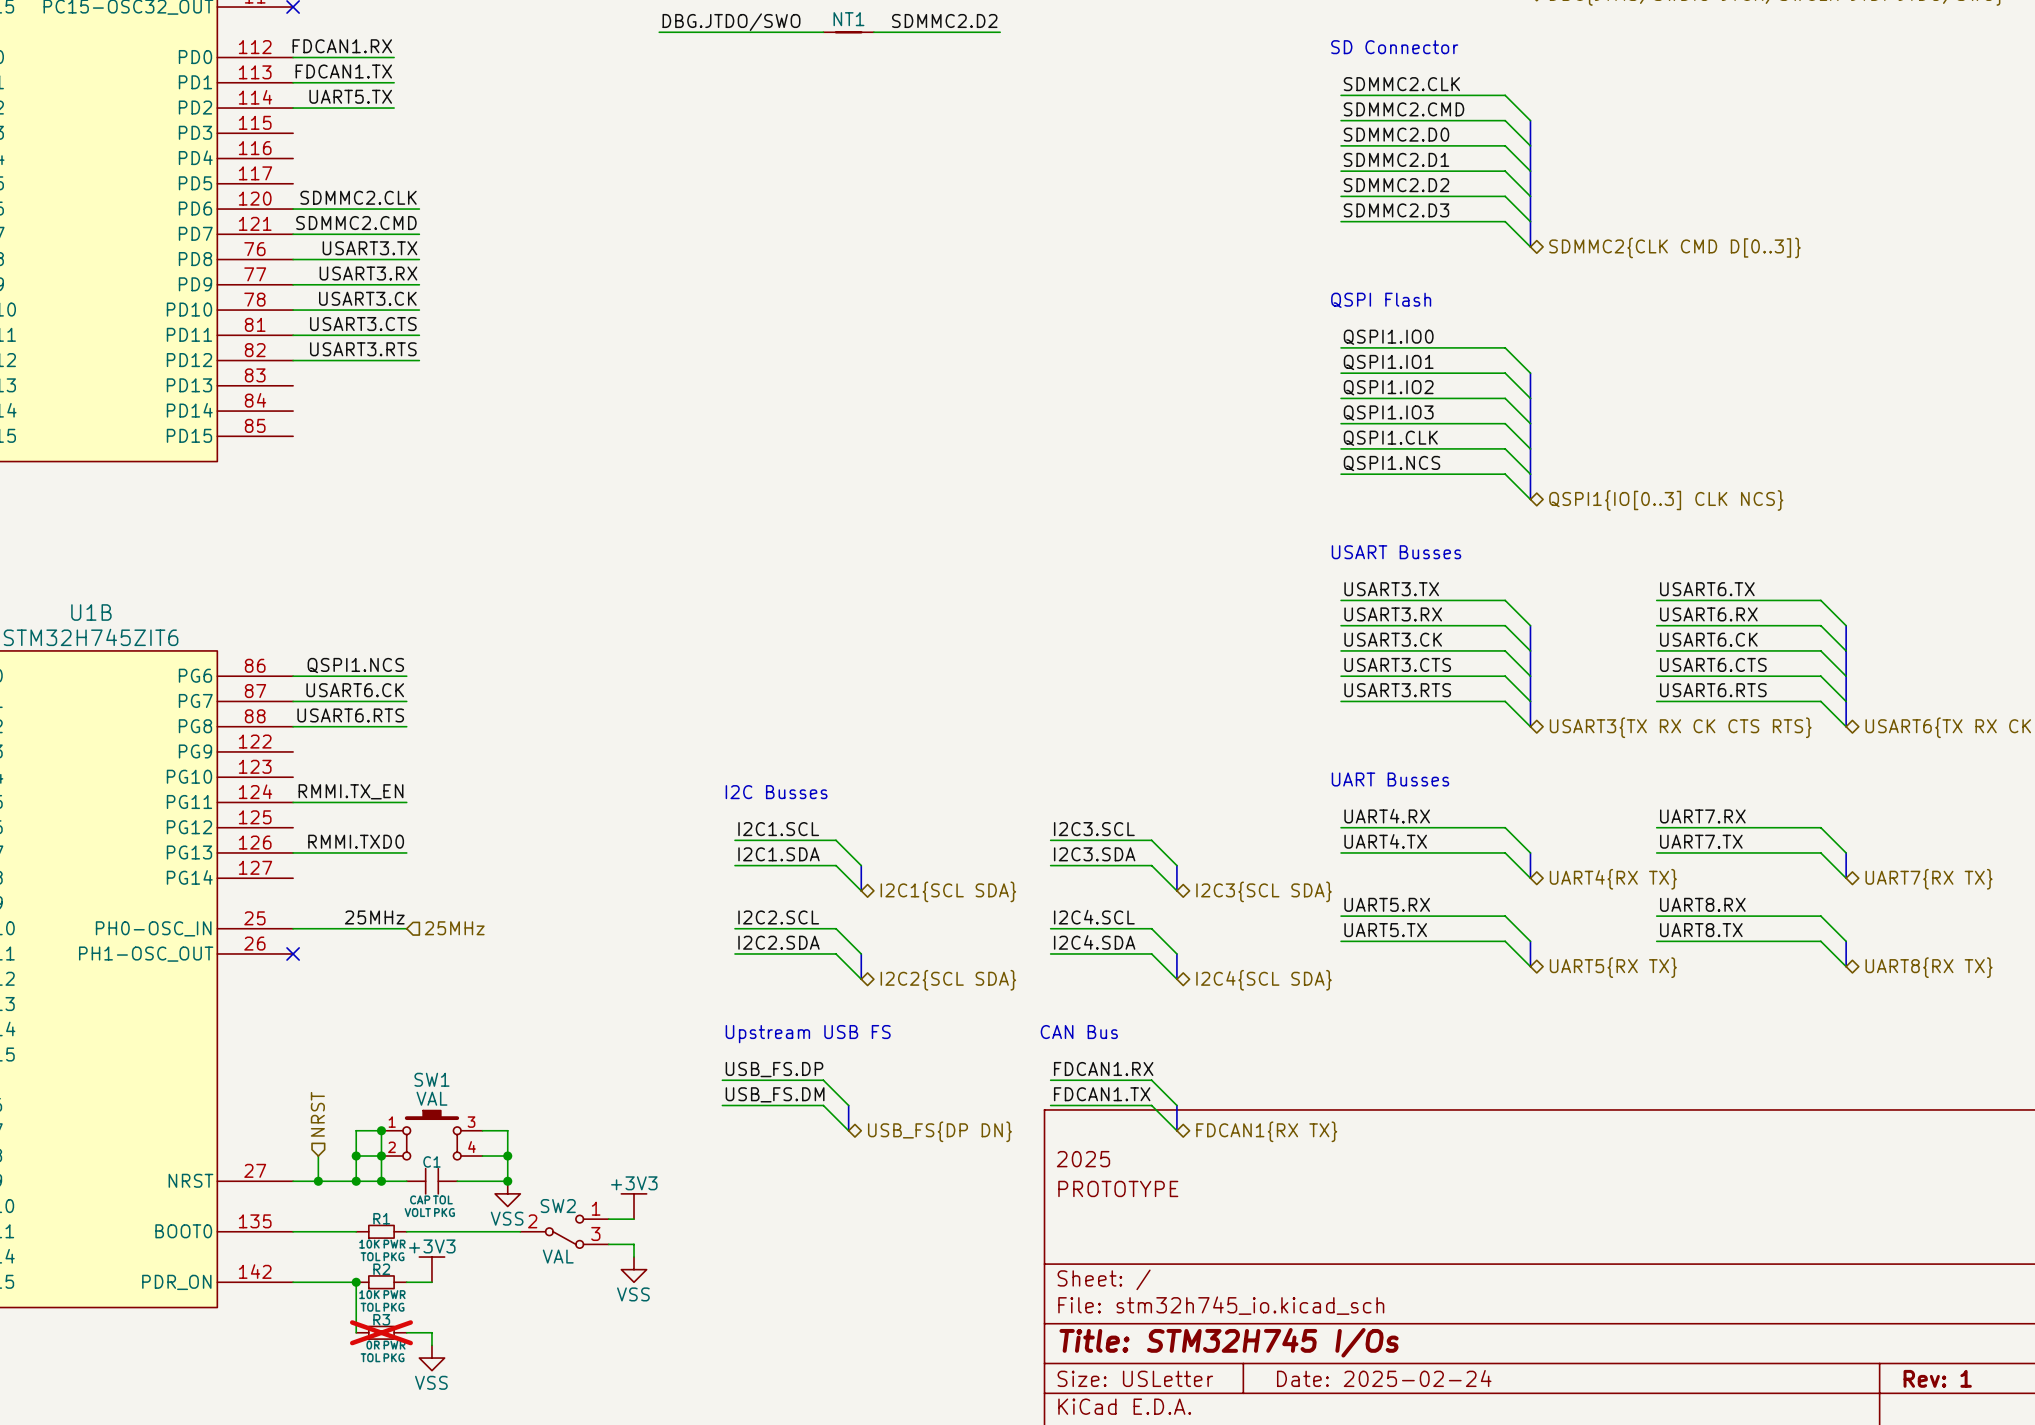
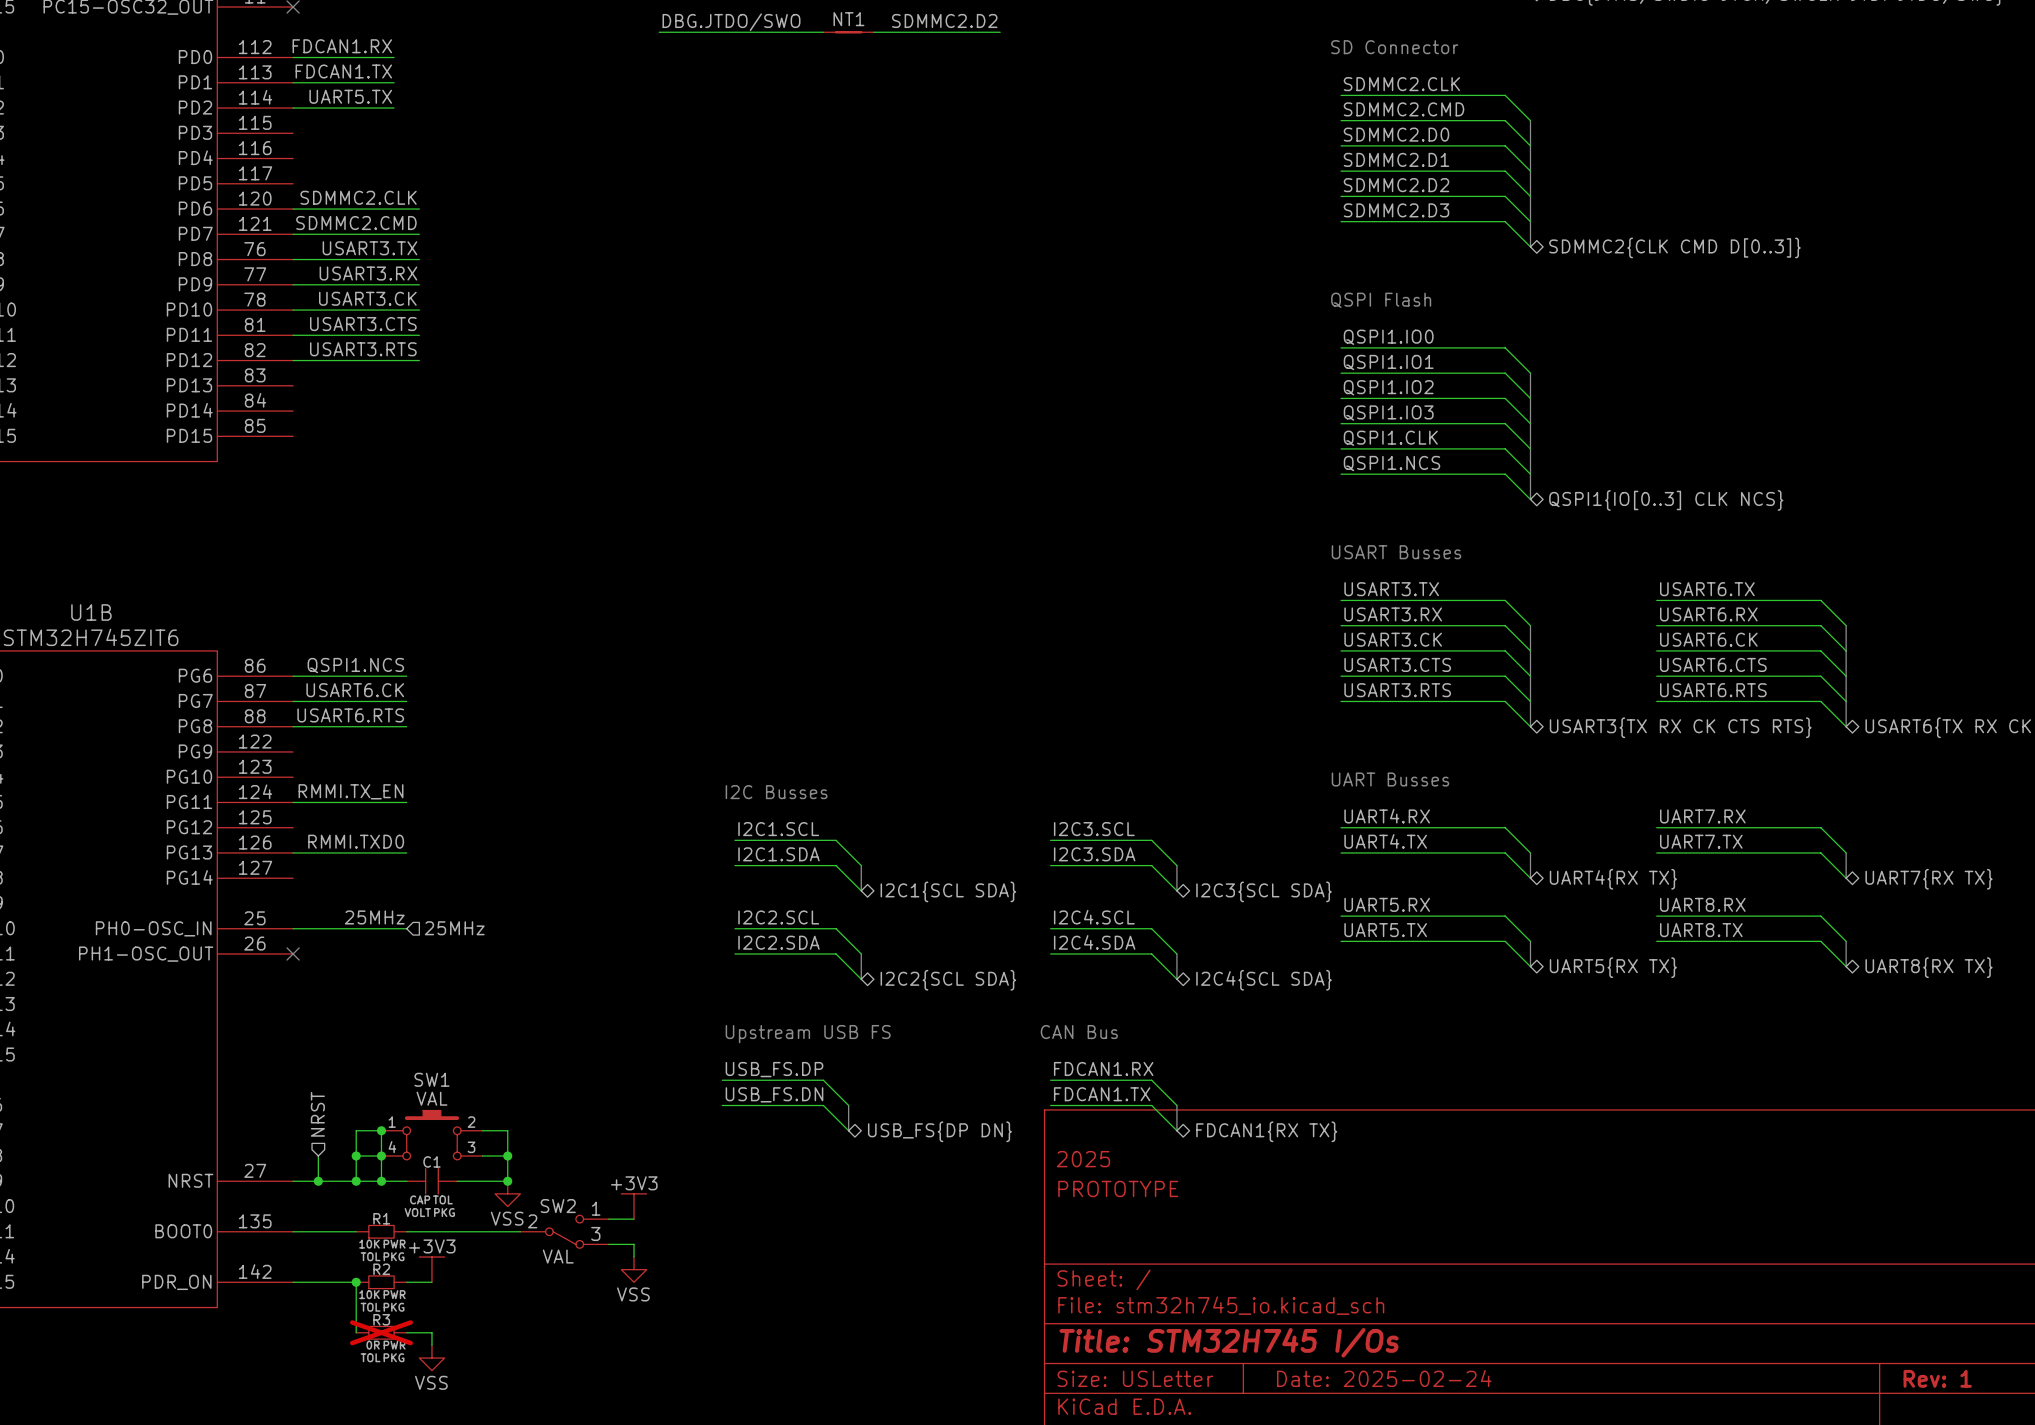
label: USB_FS.DM (775, 1094) -> USB_FS.DN (774, 1094)
SW1 pin number: 3 (471, 1122) -> 2 (471, 1122)
SW1 pin number: 2 (391, 1147) -> 4 (392, 1147)
SW1 pin number: 4 (471, 1147) -> 3 (471, 1147)

